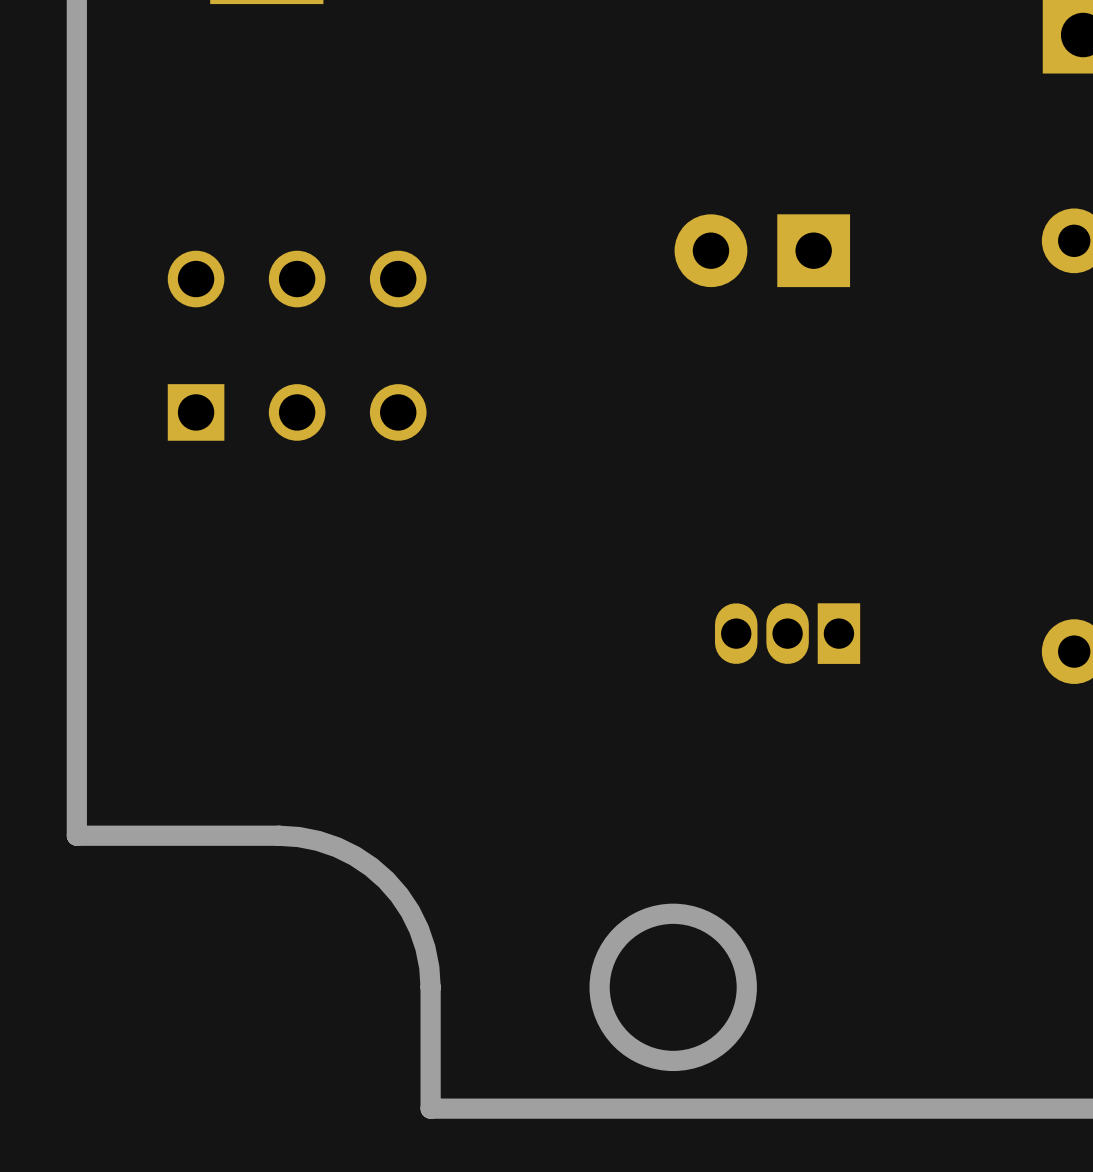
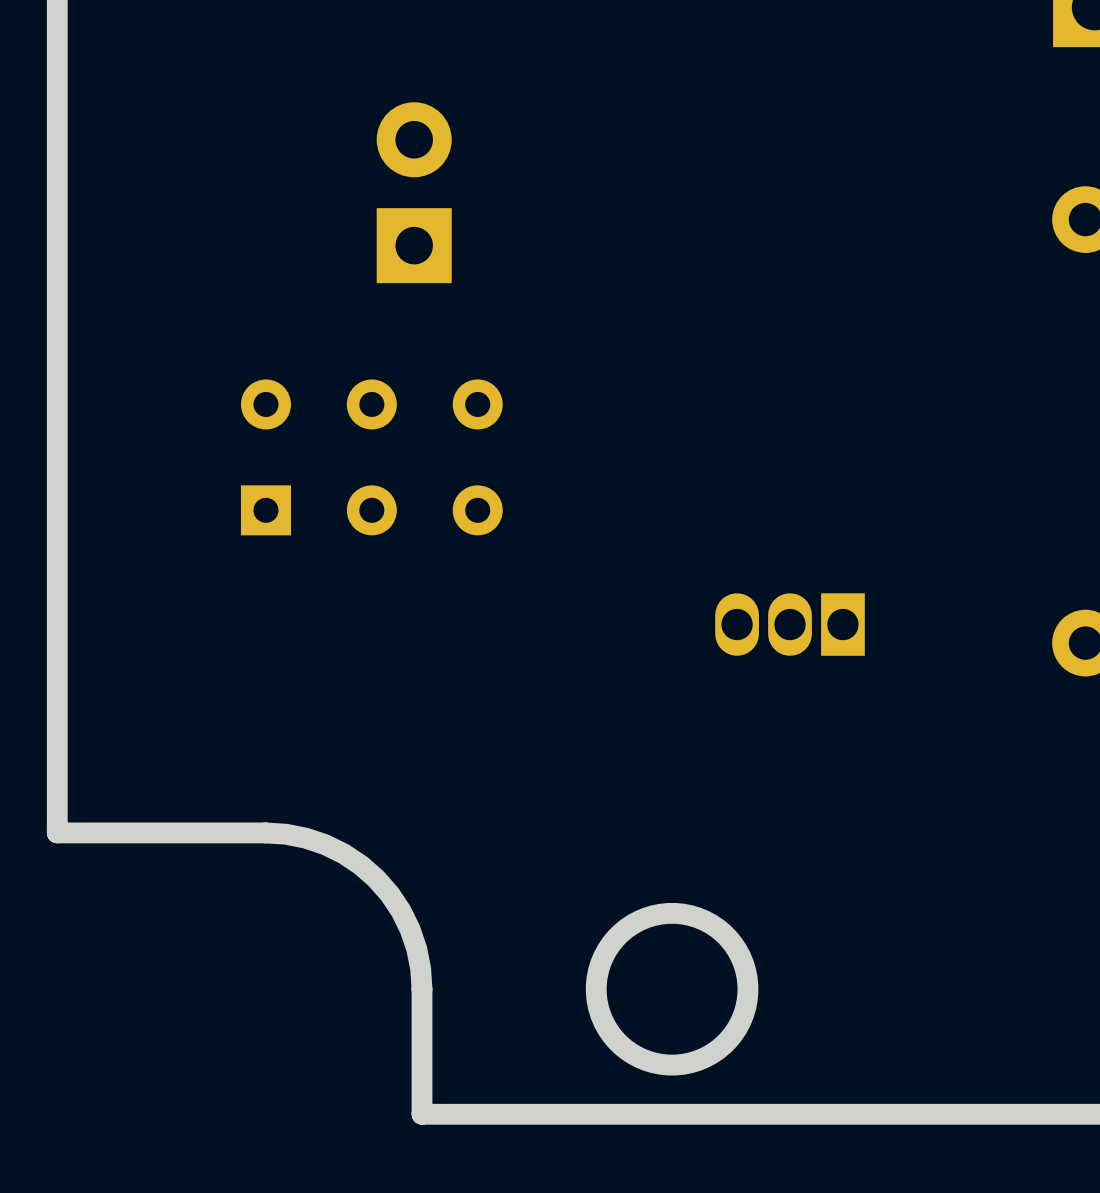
part rotation: 0° (762, 250) -> 90° clockwise (414, 192)
part position: (762, 250) -> (414, 192)
part: (297, 345) -> none
part: none -> (371, 457)

